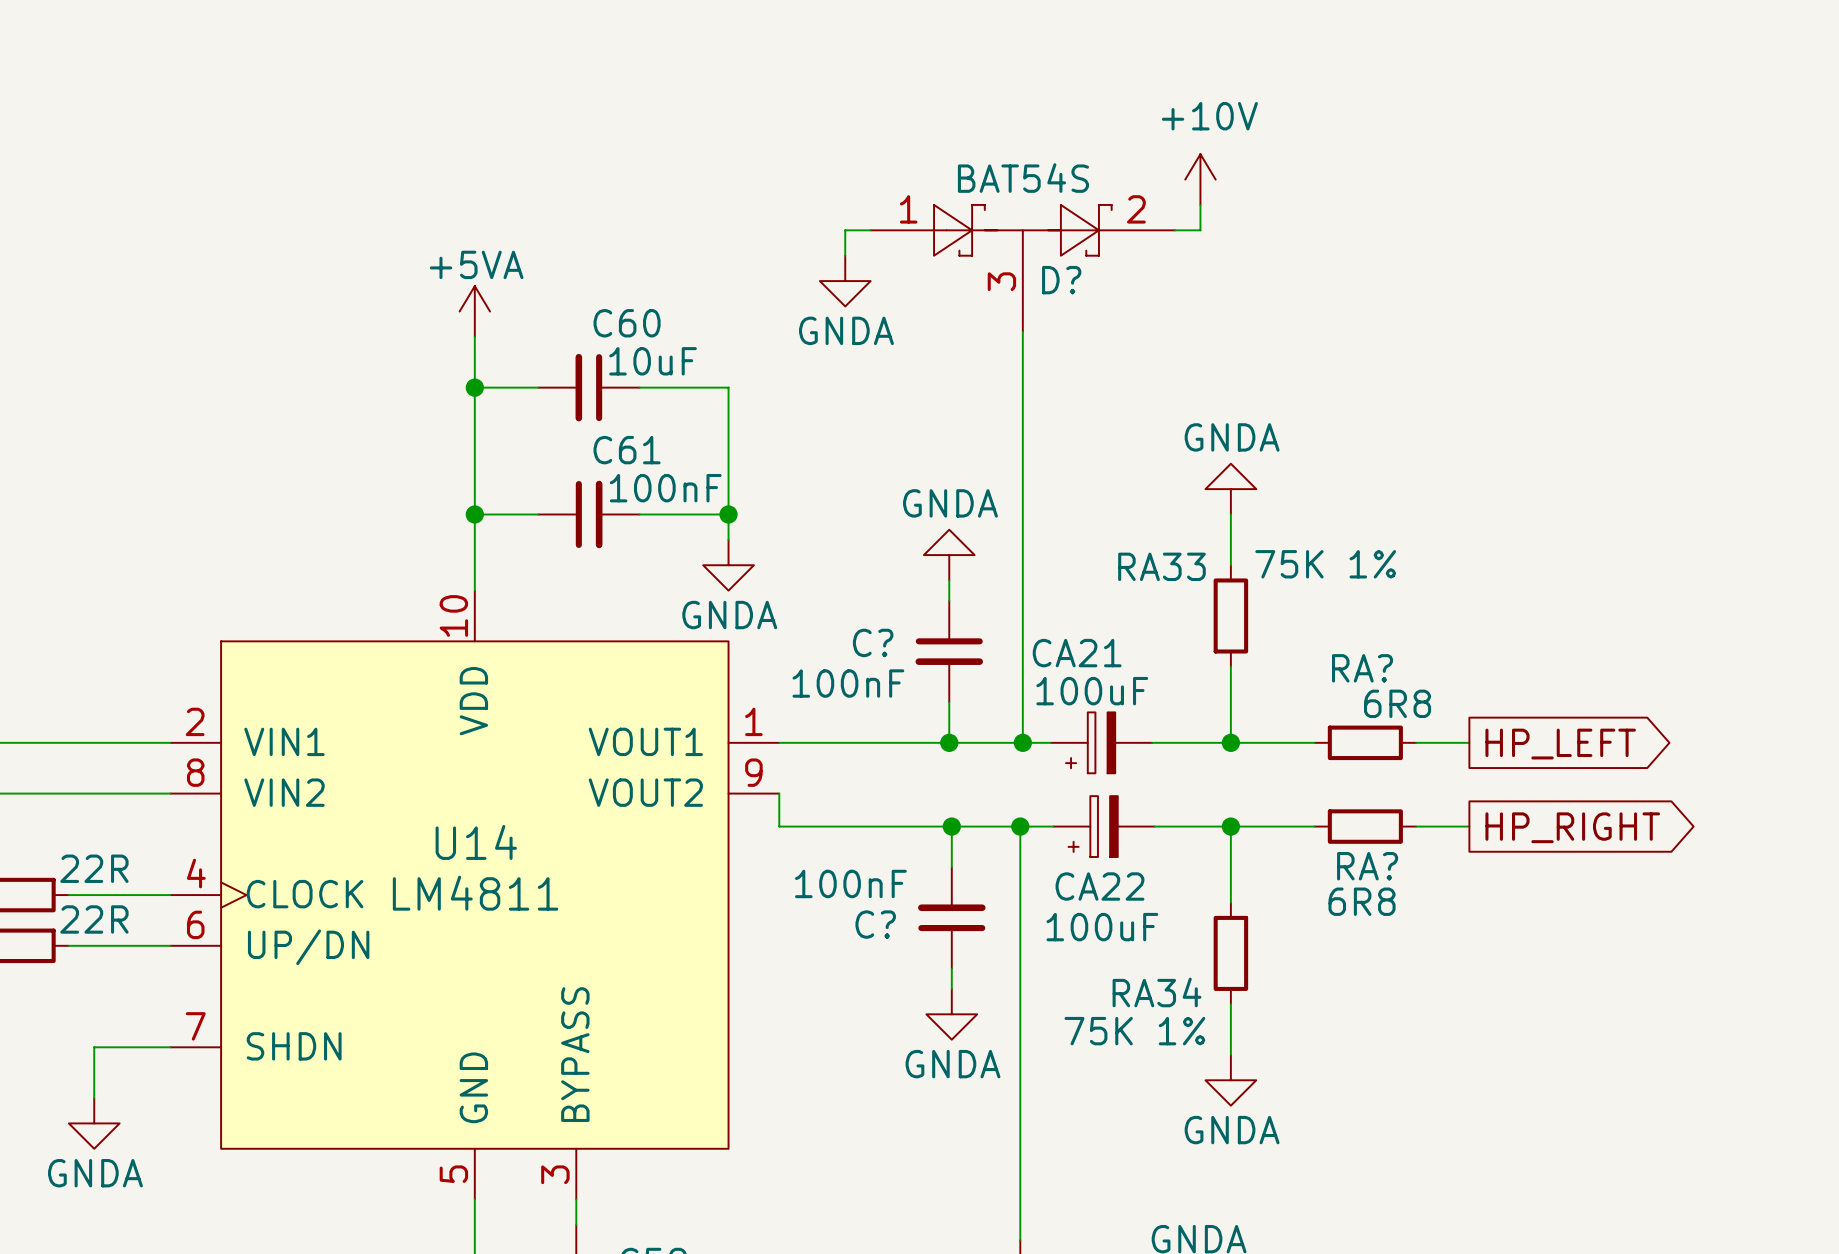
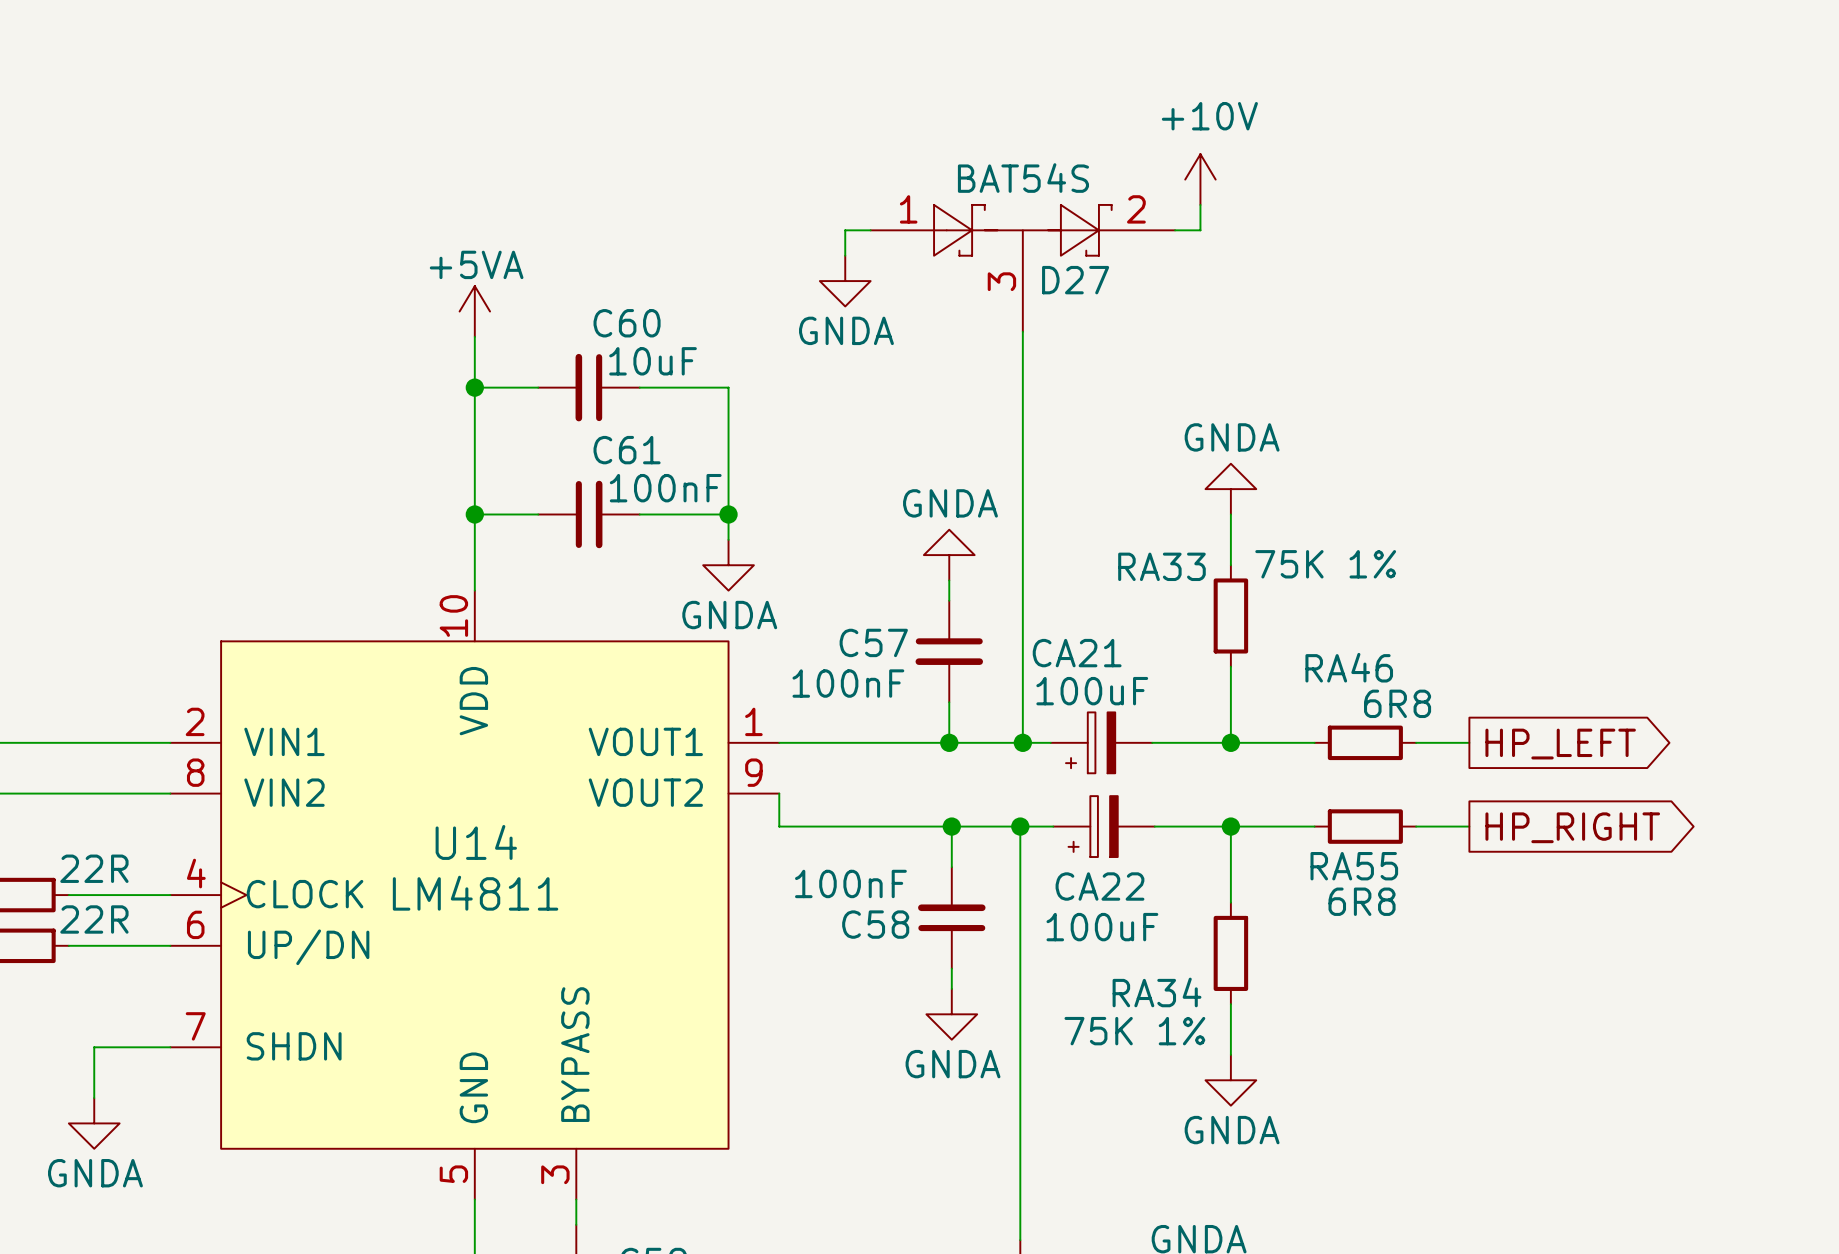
D? name: D? (1061, 280) -> D27 (1075, 280)
C? name: C? (873, 642) -> C57 (873, 642)
RA? name: RA? (1362, 668) -> RA46 (1349, 667)
RA? name: RA? (1367, 866) -> RA55 (1354, 866)
C? name: C? (875, 924) -> C58 (875, 924)

